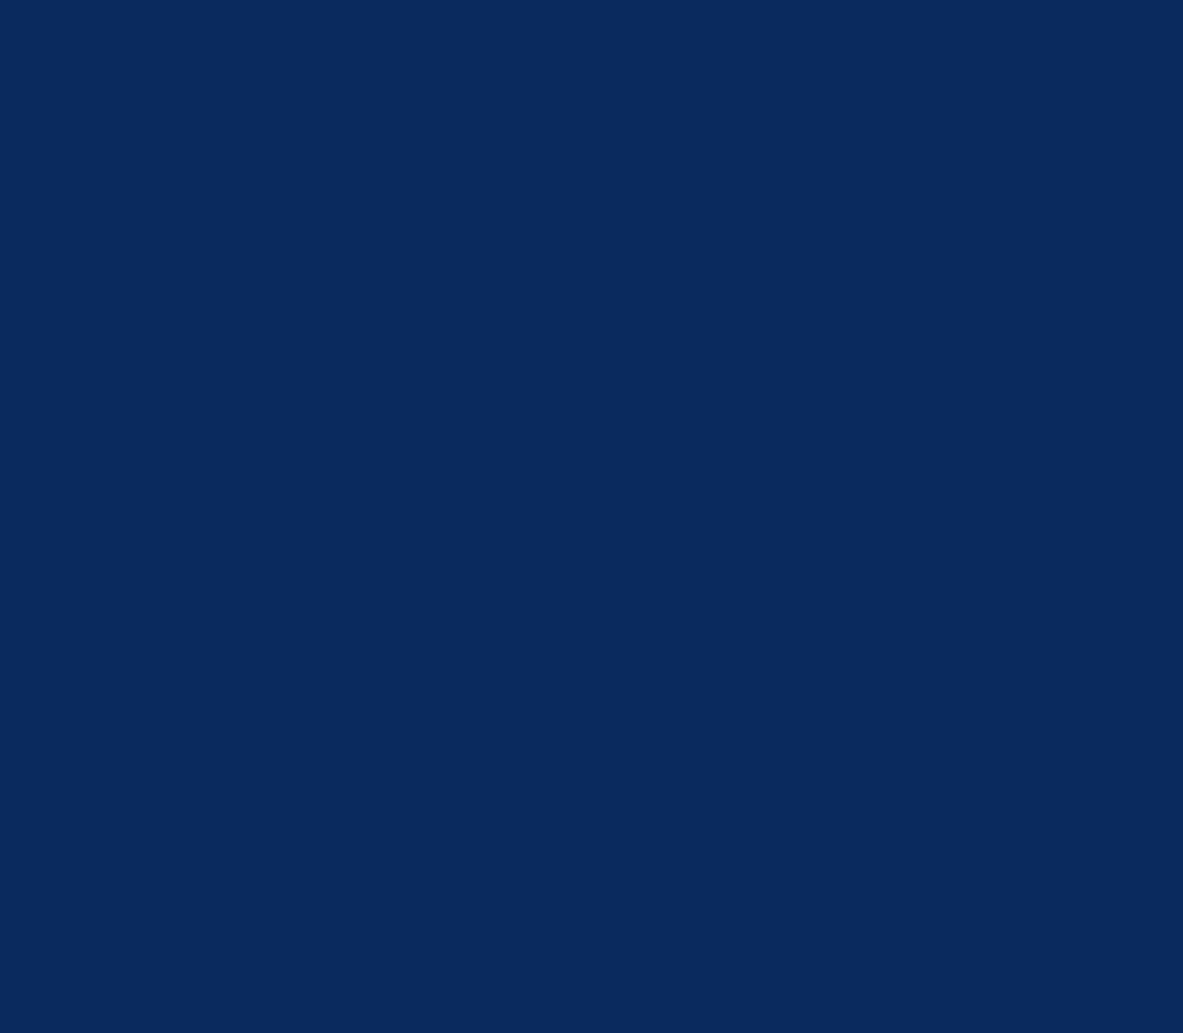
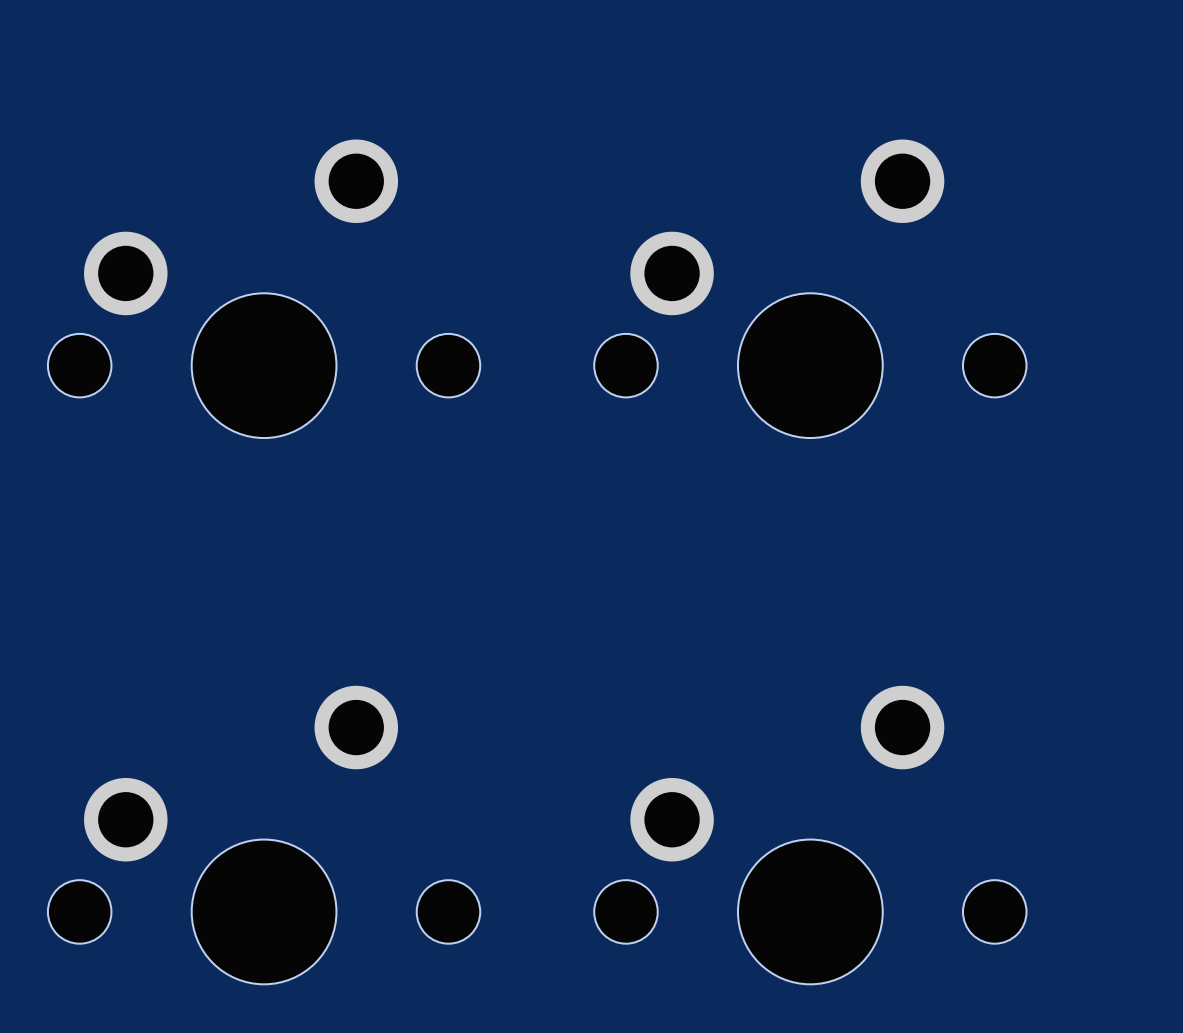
part: none -> (264, 288)
part: none -> (810, 288)
part: none -> (264, 835)
part: none -> (810, 835)

